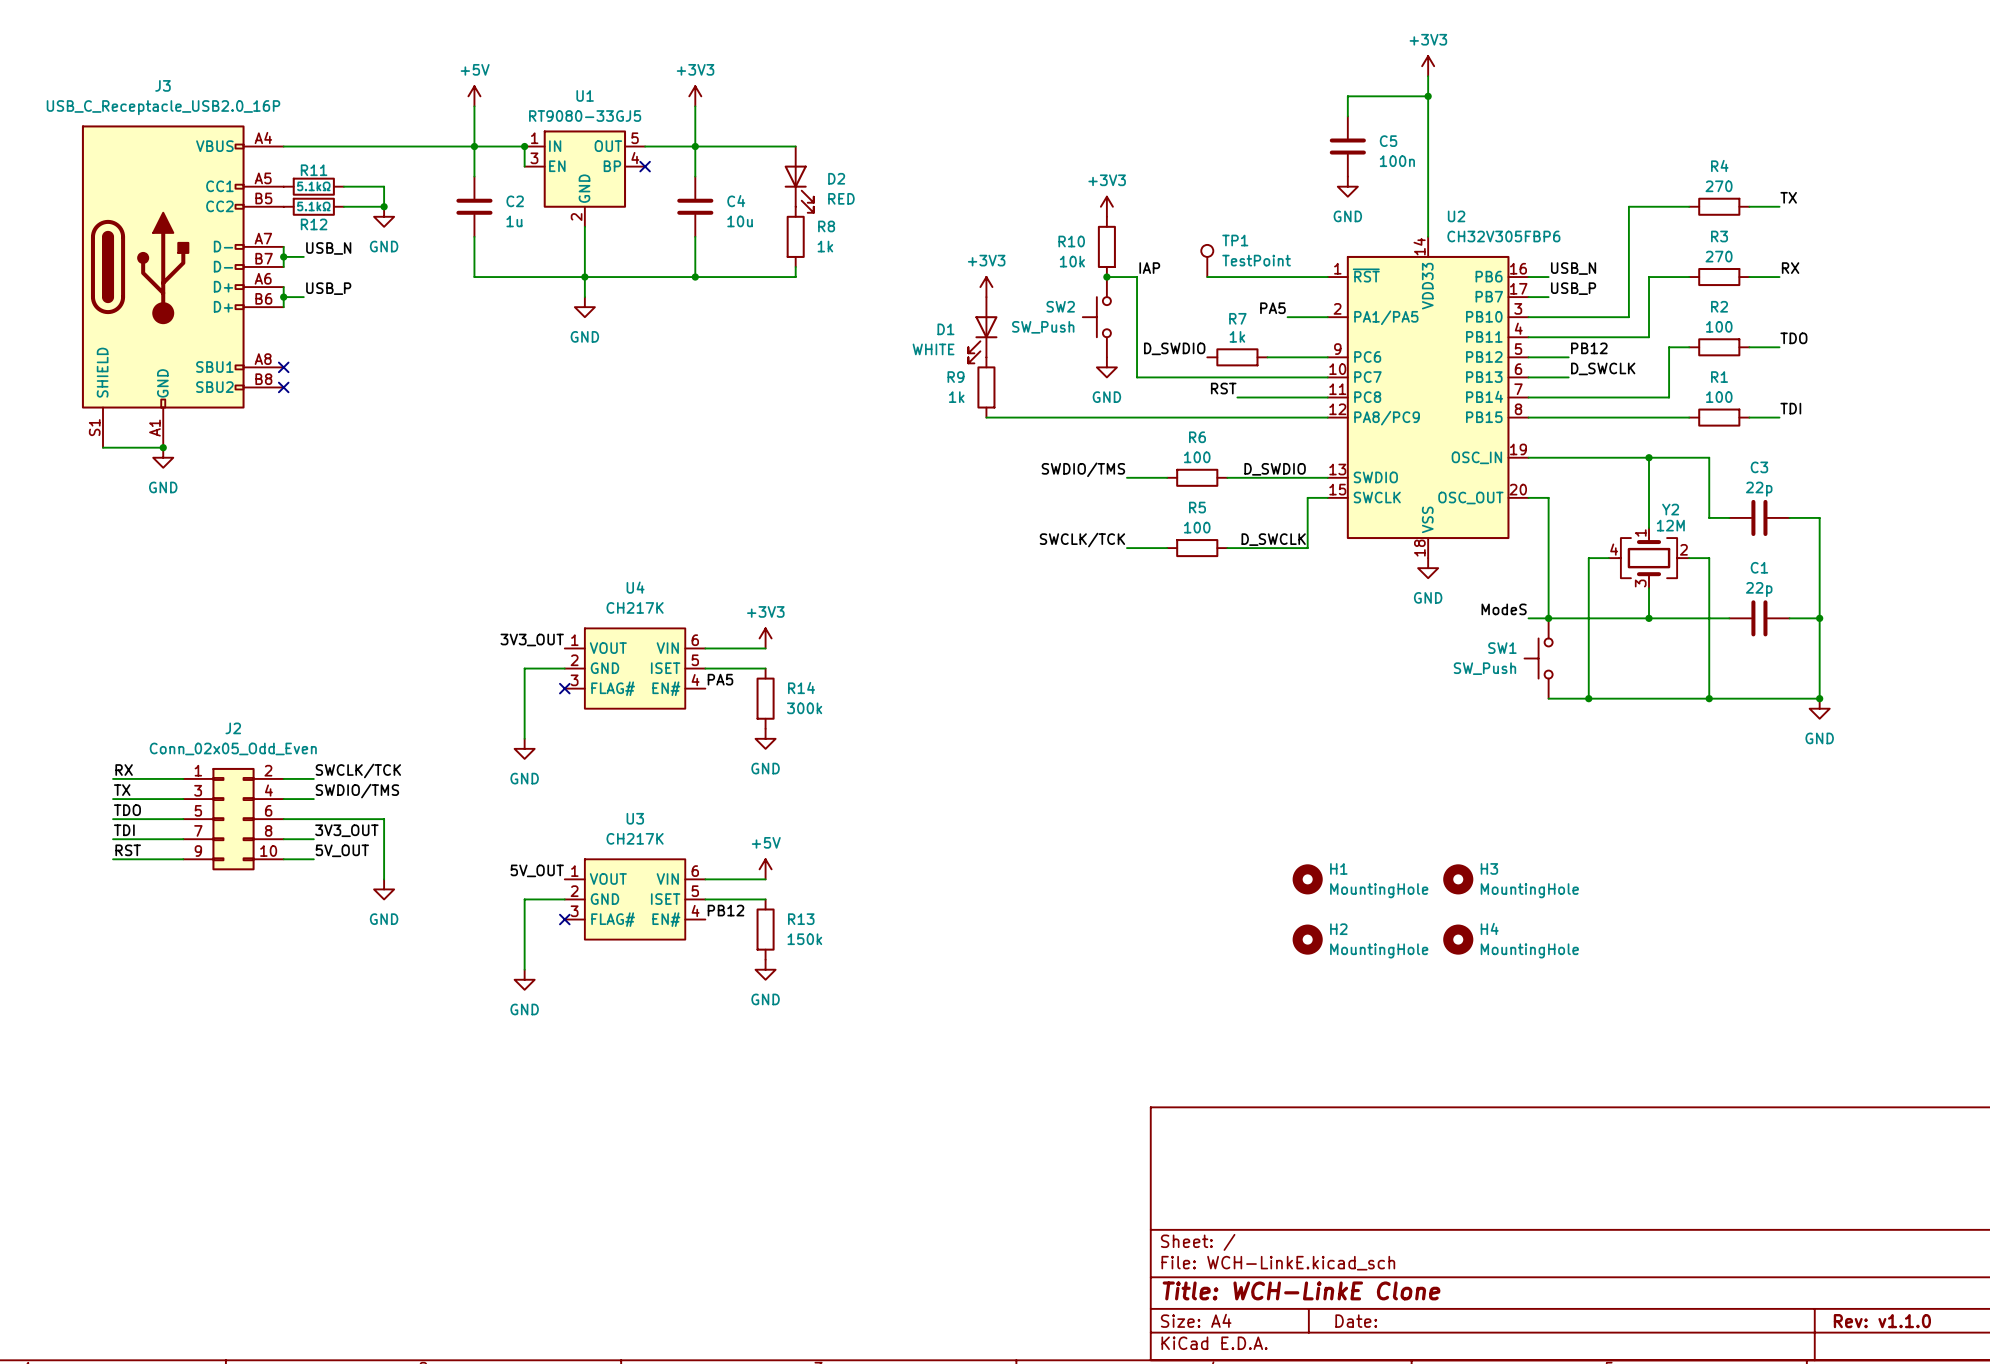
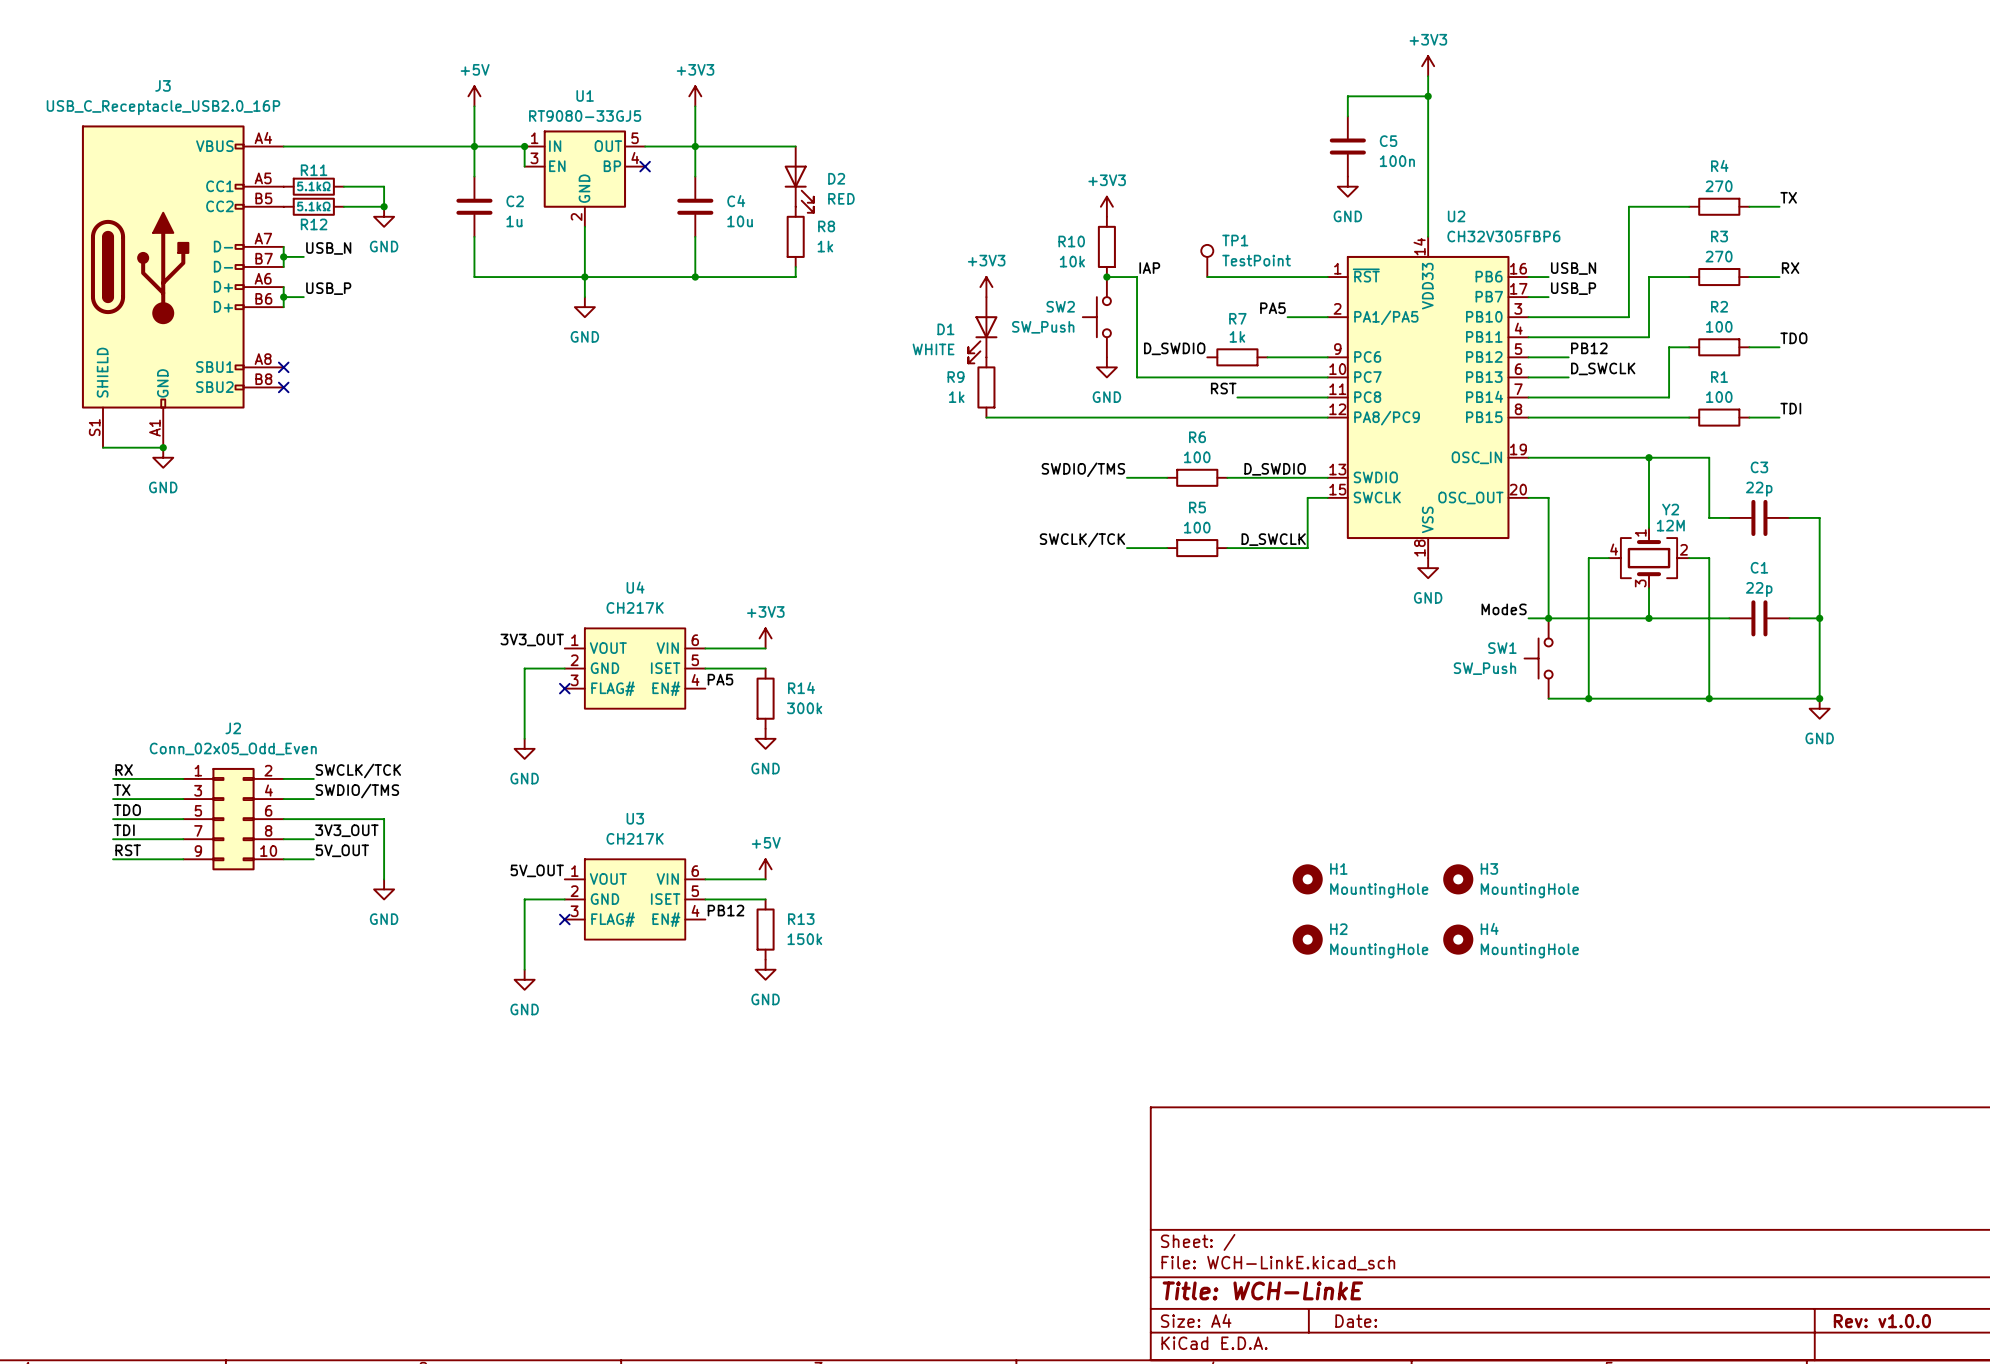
title block: Title: WCH-LinkE Clone (1301, 1290) -> Title: WCH-LinkE (1262, 1290)
title block: Rev: v1.1.0 (1882, 1321) -> Rev: v1.0.0 (1882, 1321)

